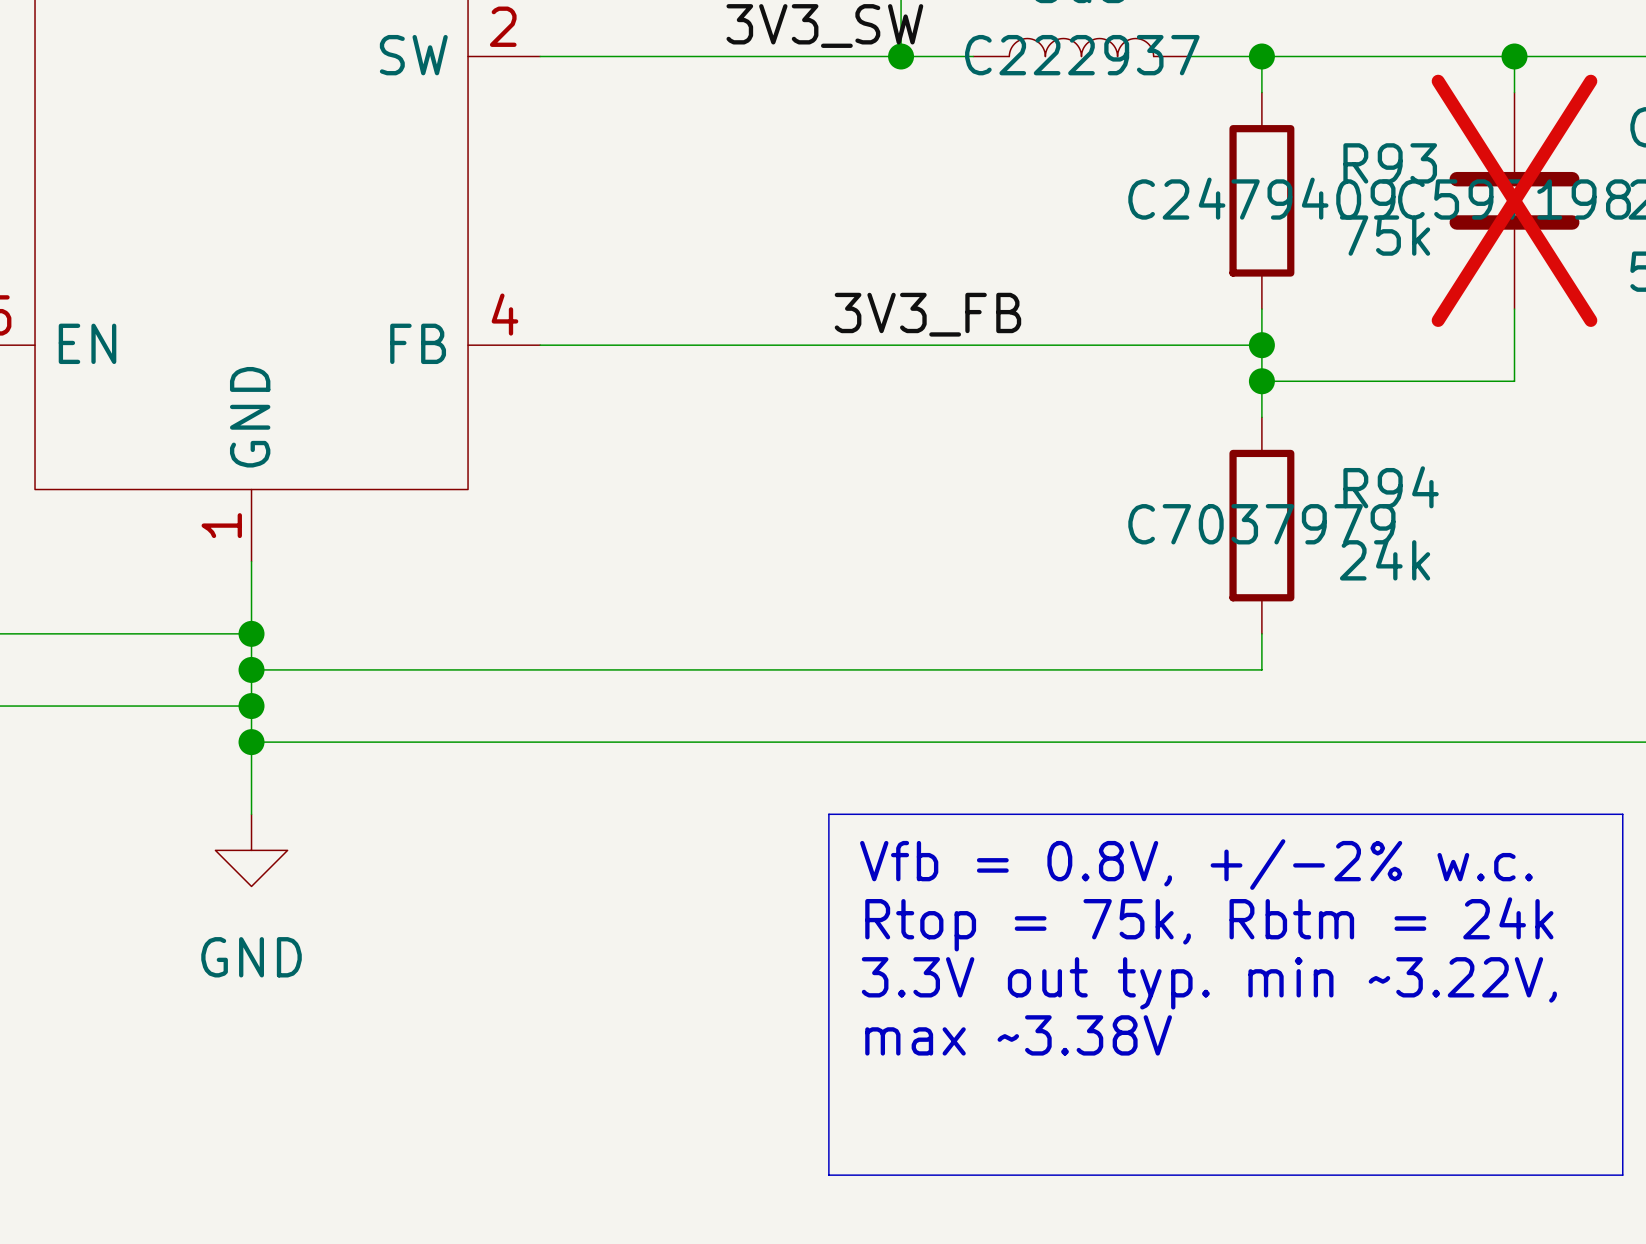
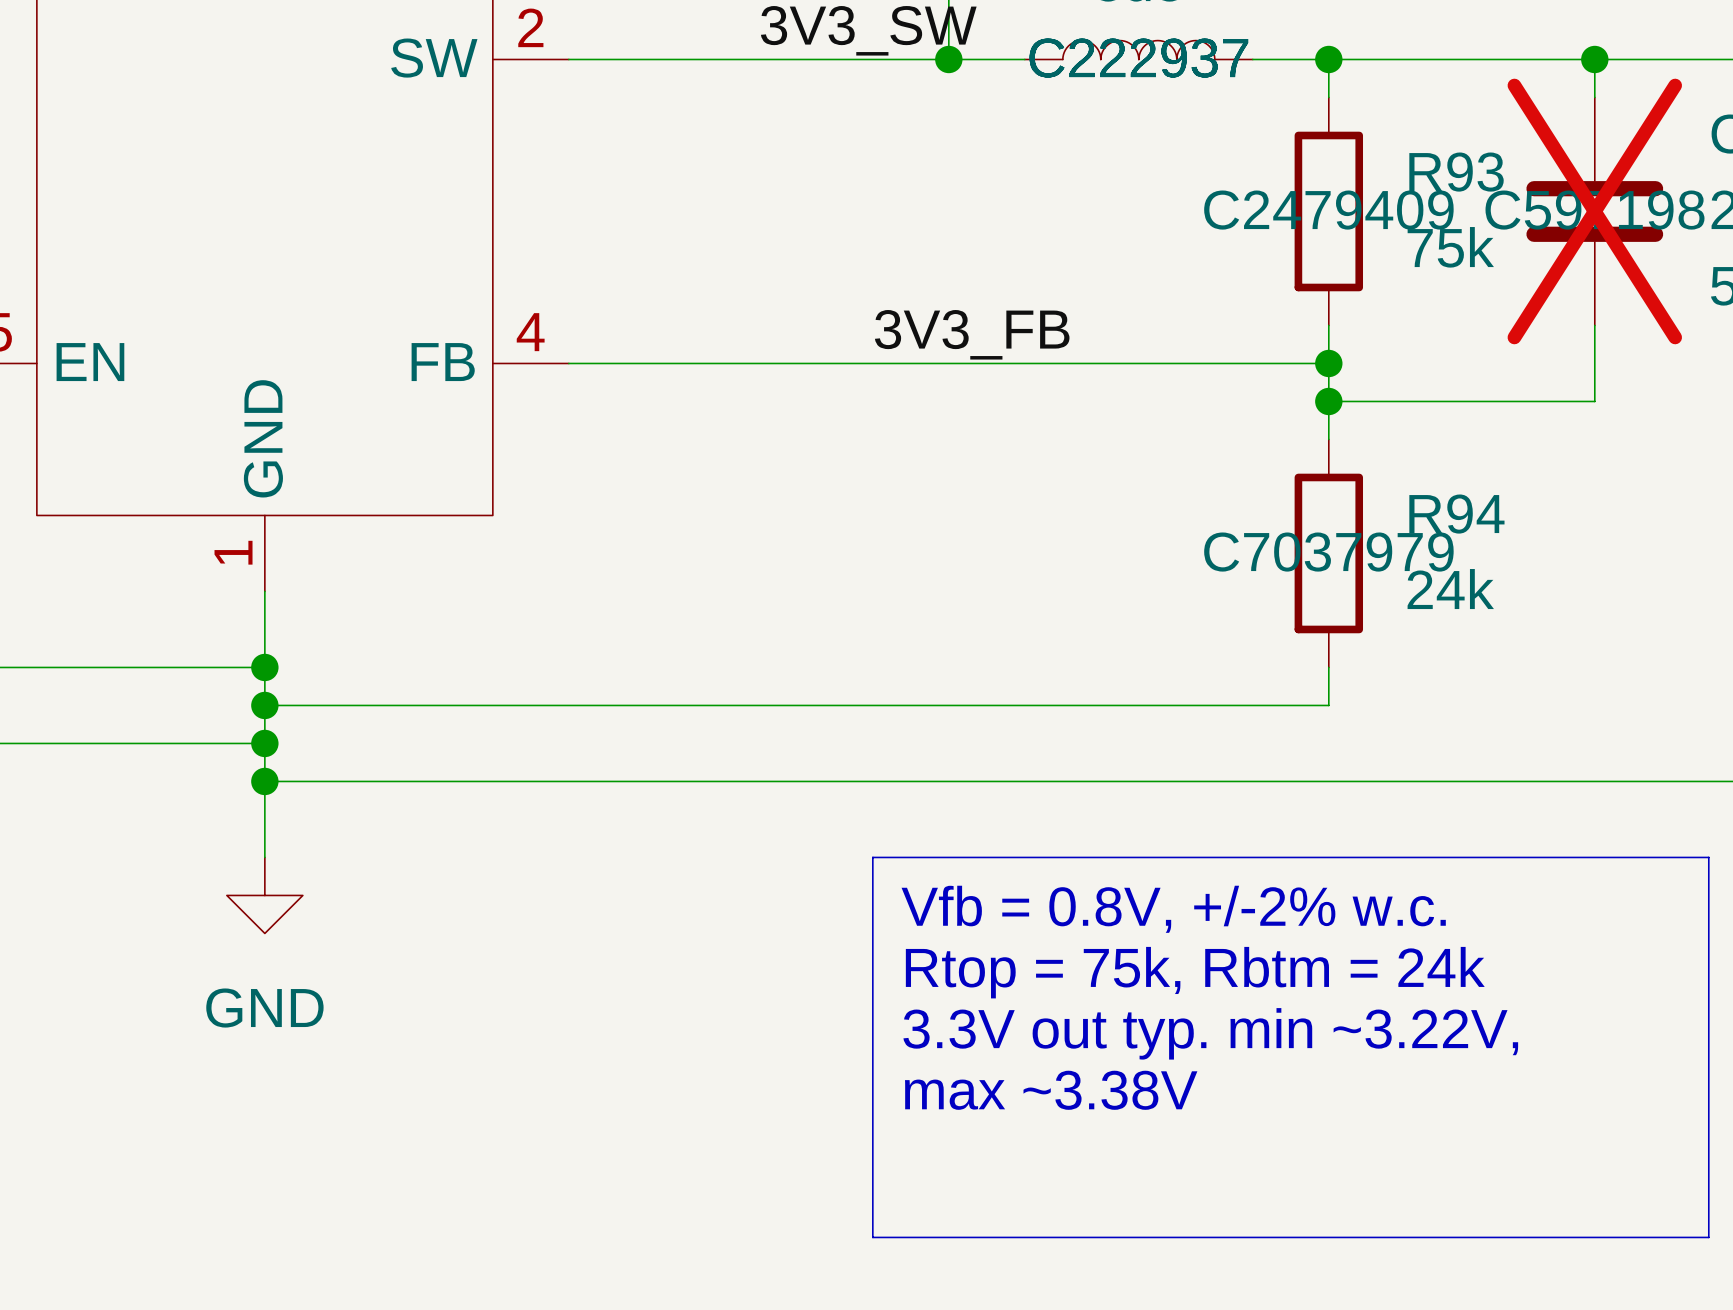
part text: none -> C222937 (1138, 58)

